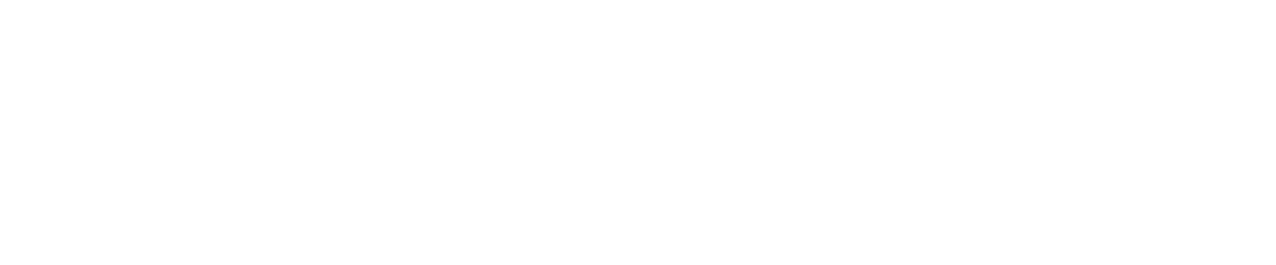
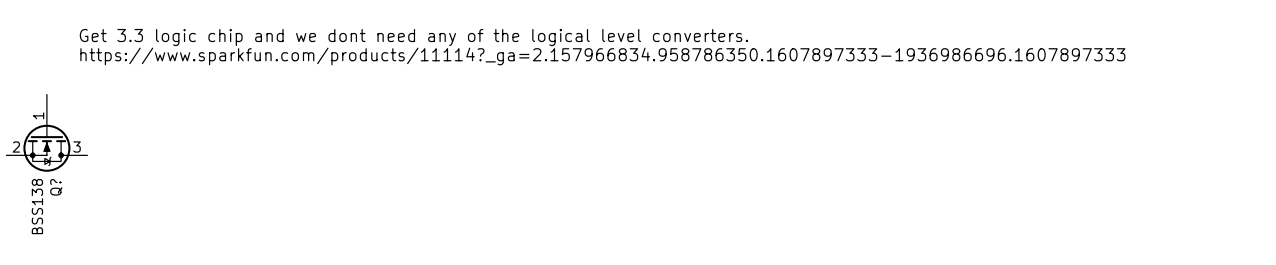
text: none -> Get 3.3 logic chip and we dont need any of the logical level converters. (413, 37)
text: none -> https://www.sparkfun.com/products/11114?_ga=2.157966834.958786350.1607897333-1936986696.1607897333 (602, 56)
Q?: none -> BSS138 (46, 133)

